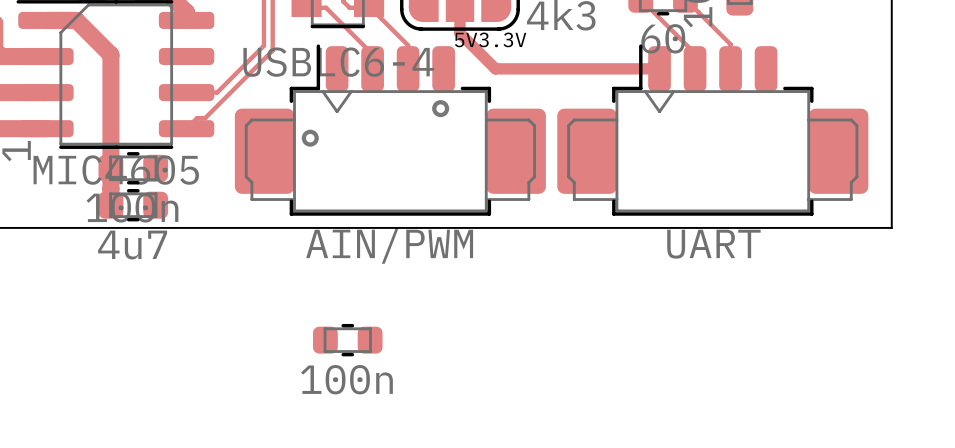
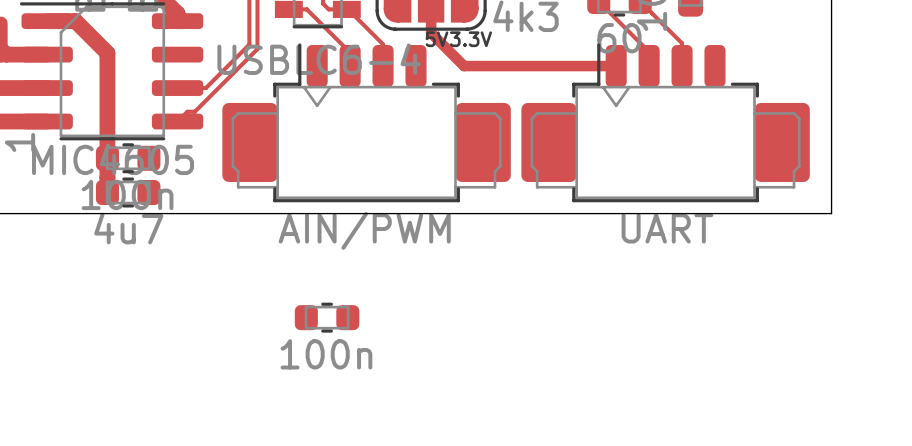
via: (440, 108) -> none
via: (310, 138) -> none

